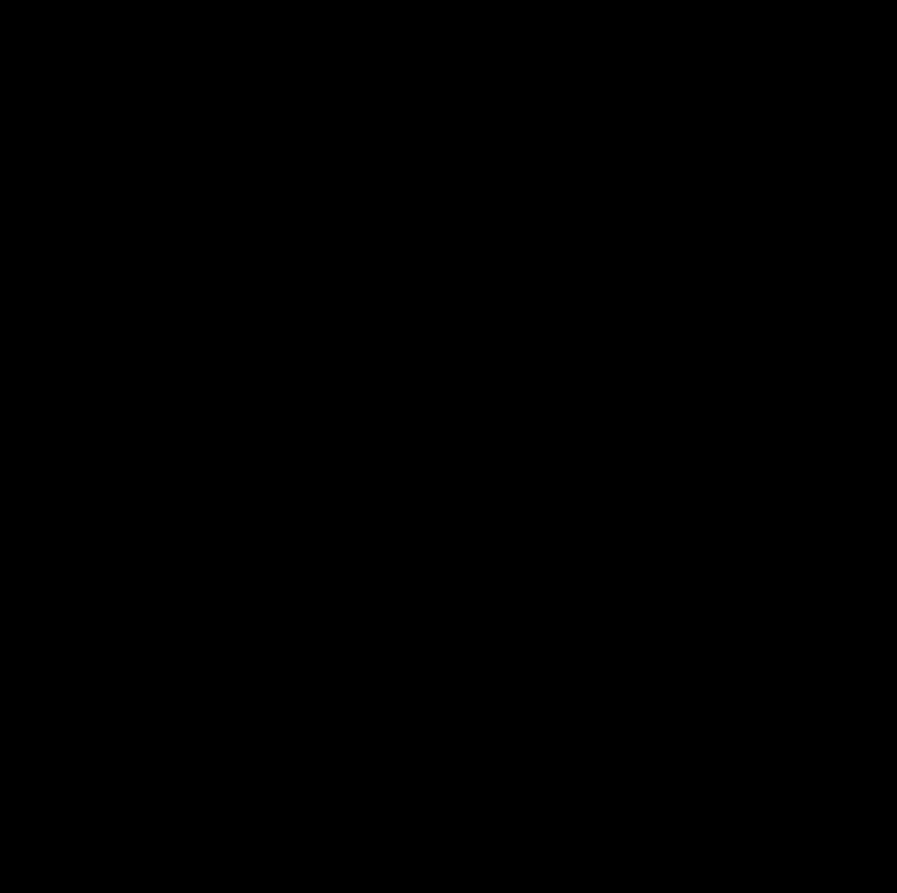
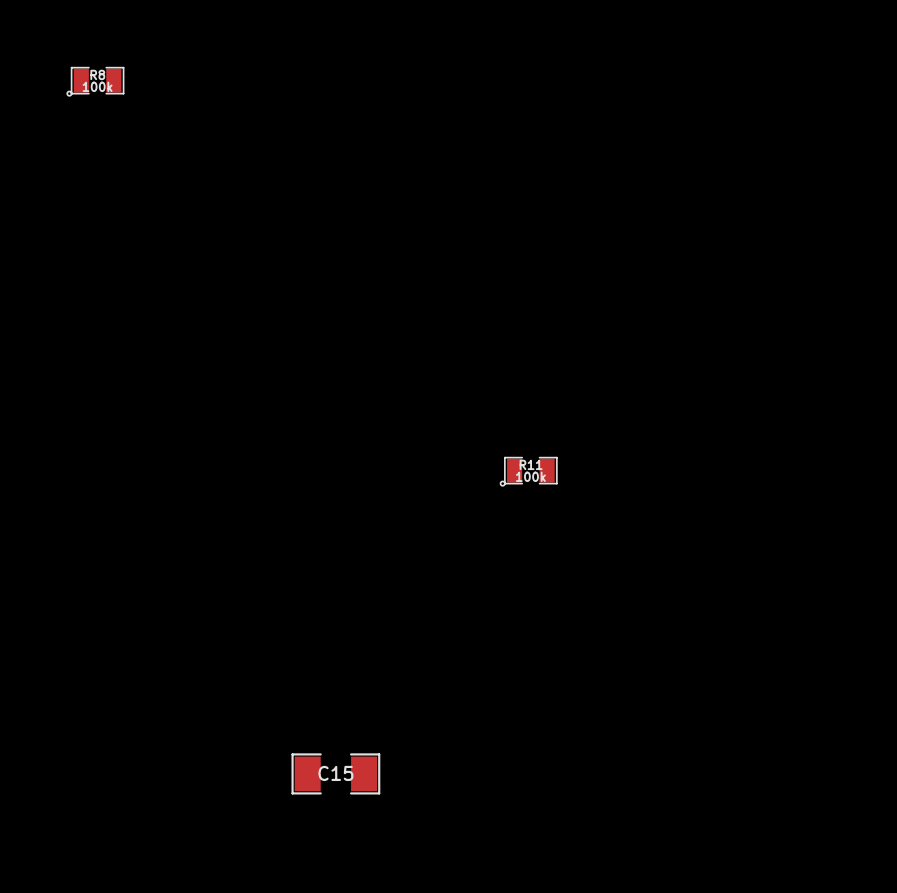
R8: none -> 100k (95, 81)
R11: none -> 100k (528, 471)
C15: none -> (335, 773)

